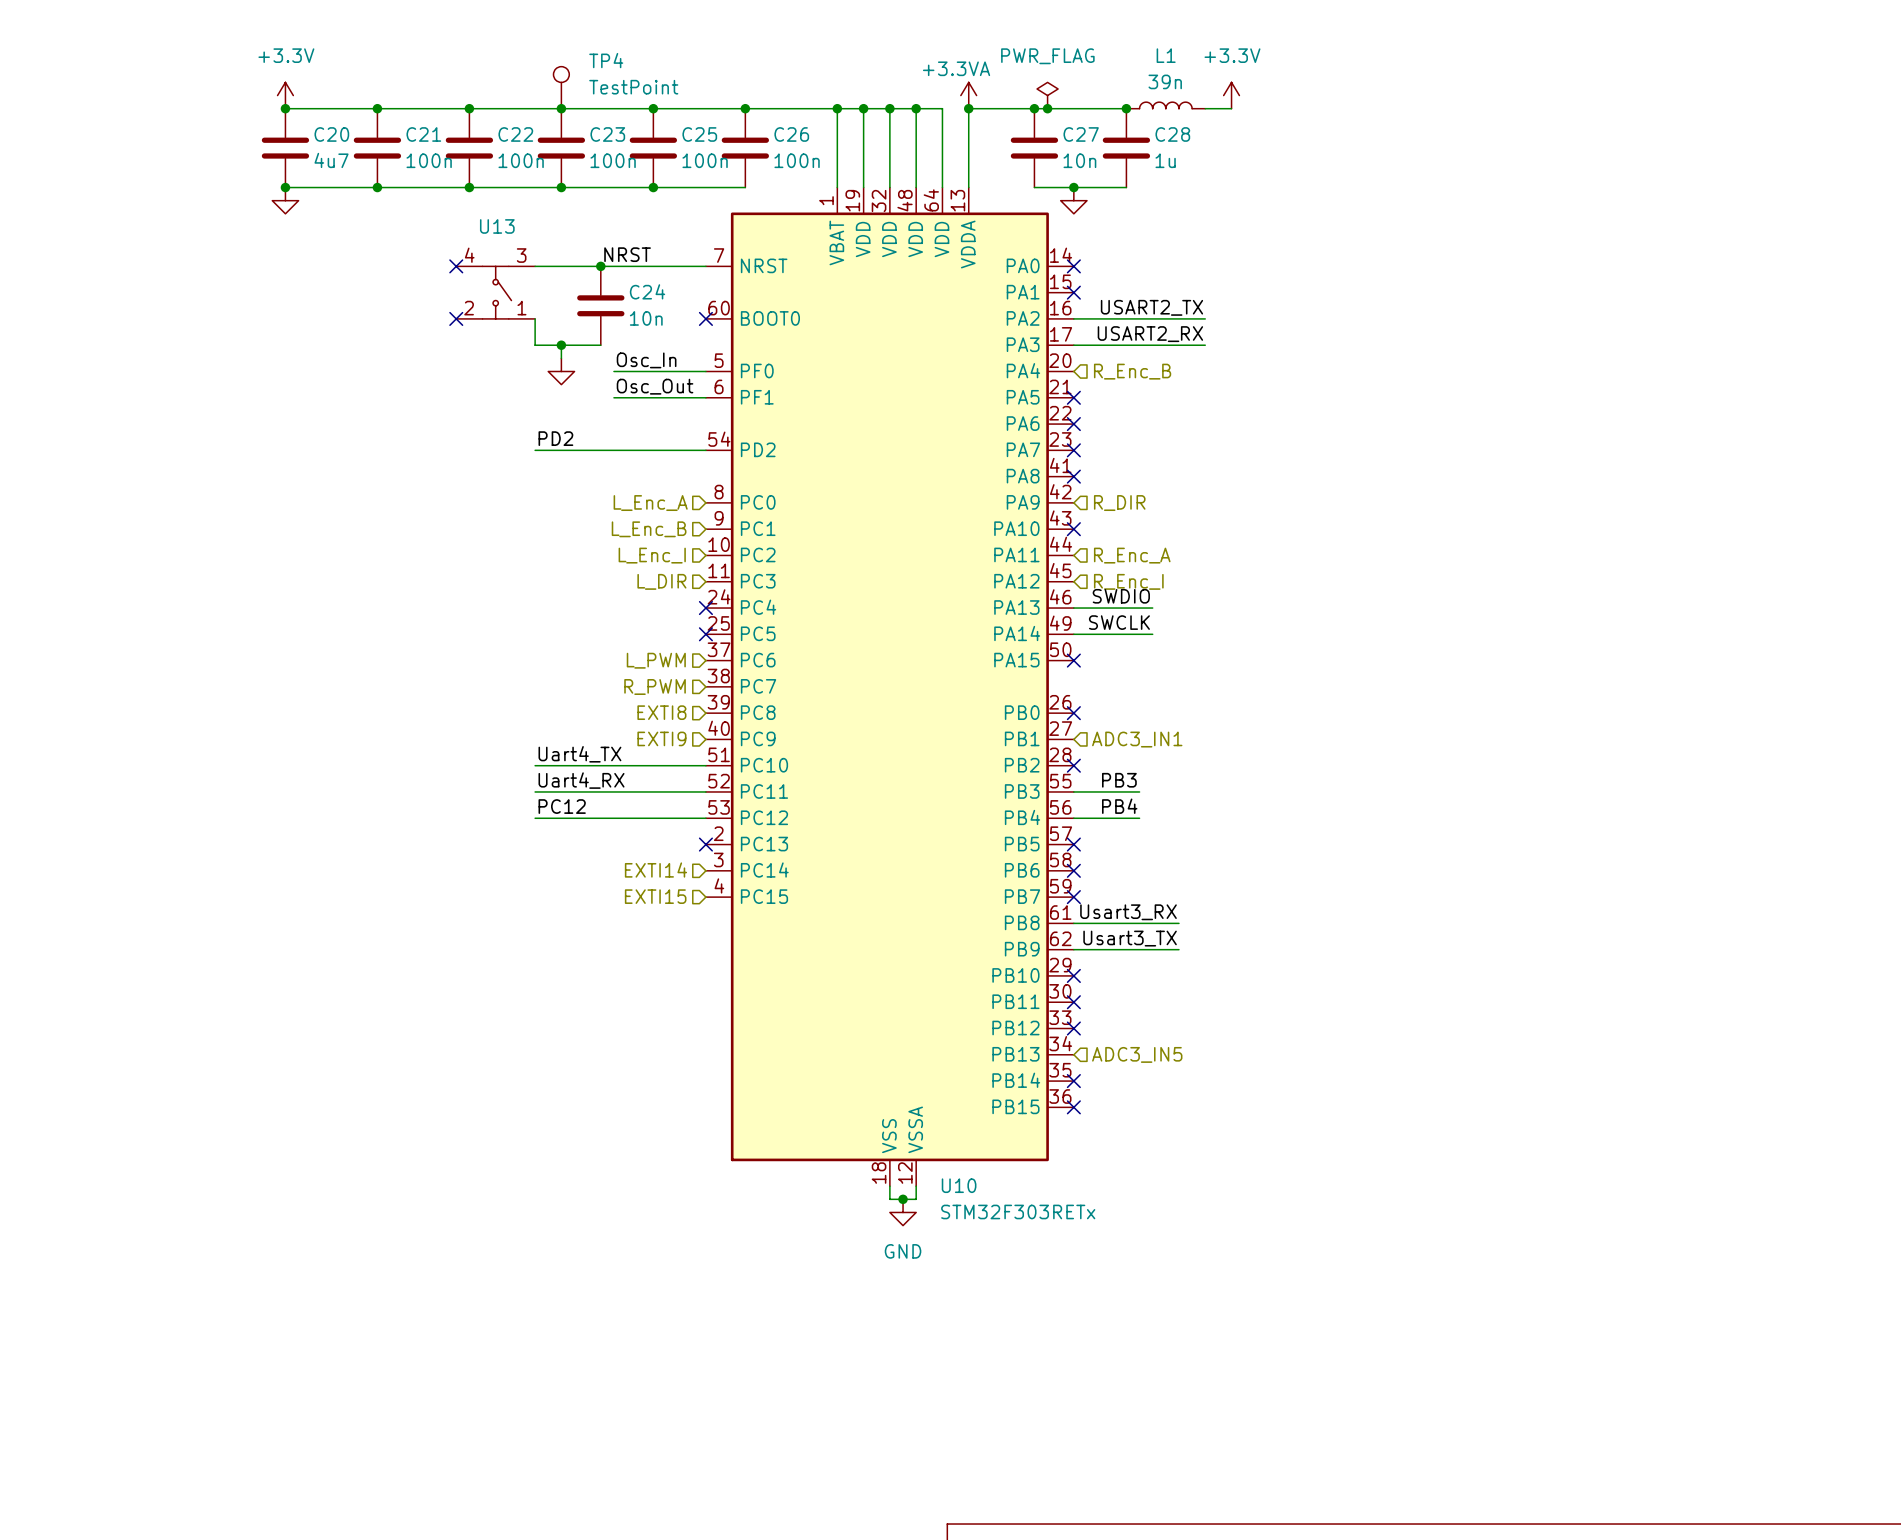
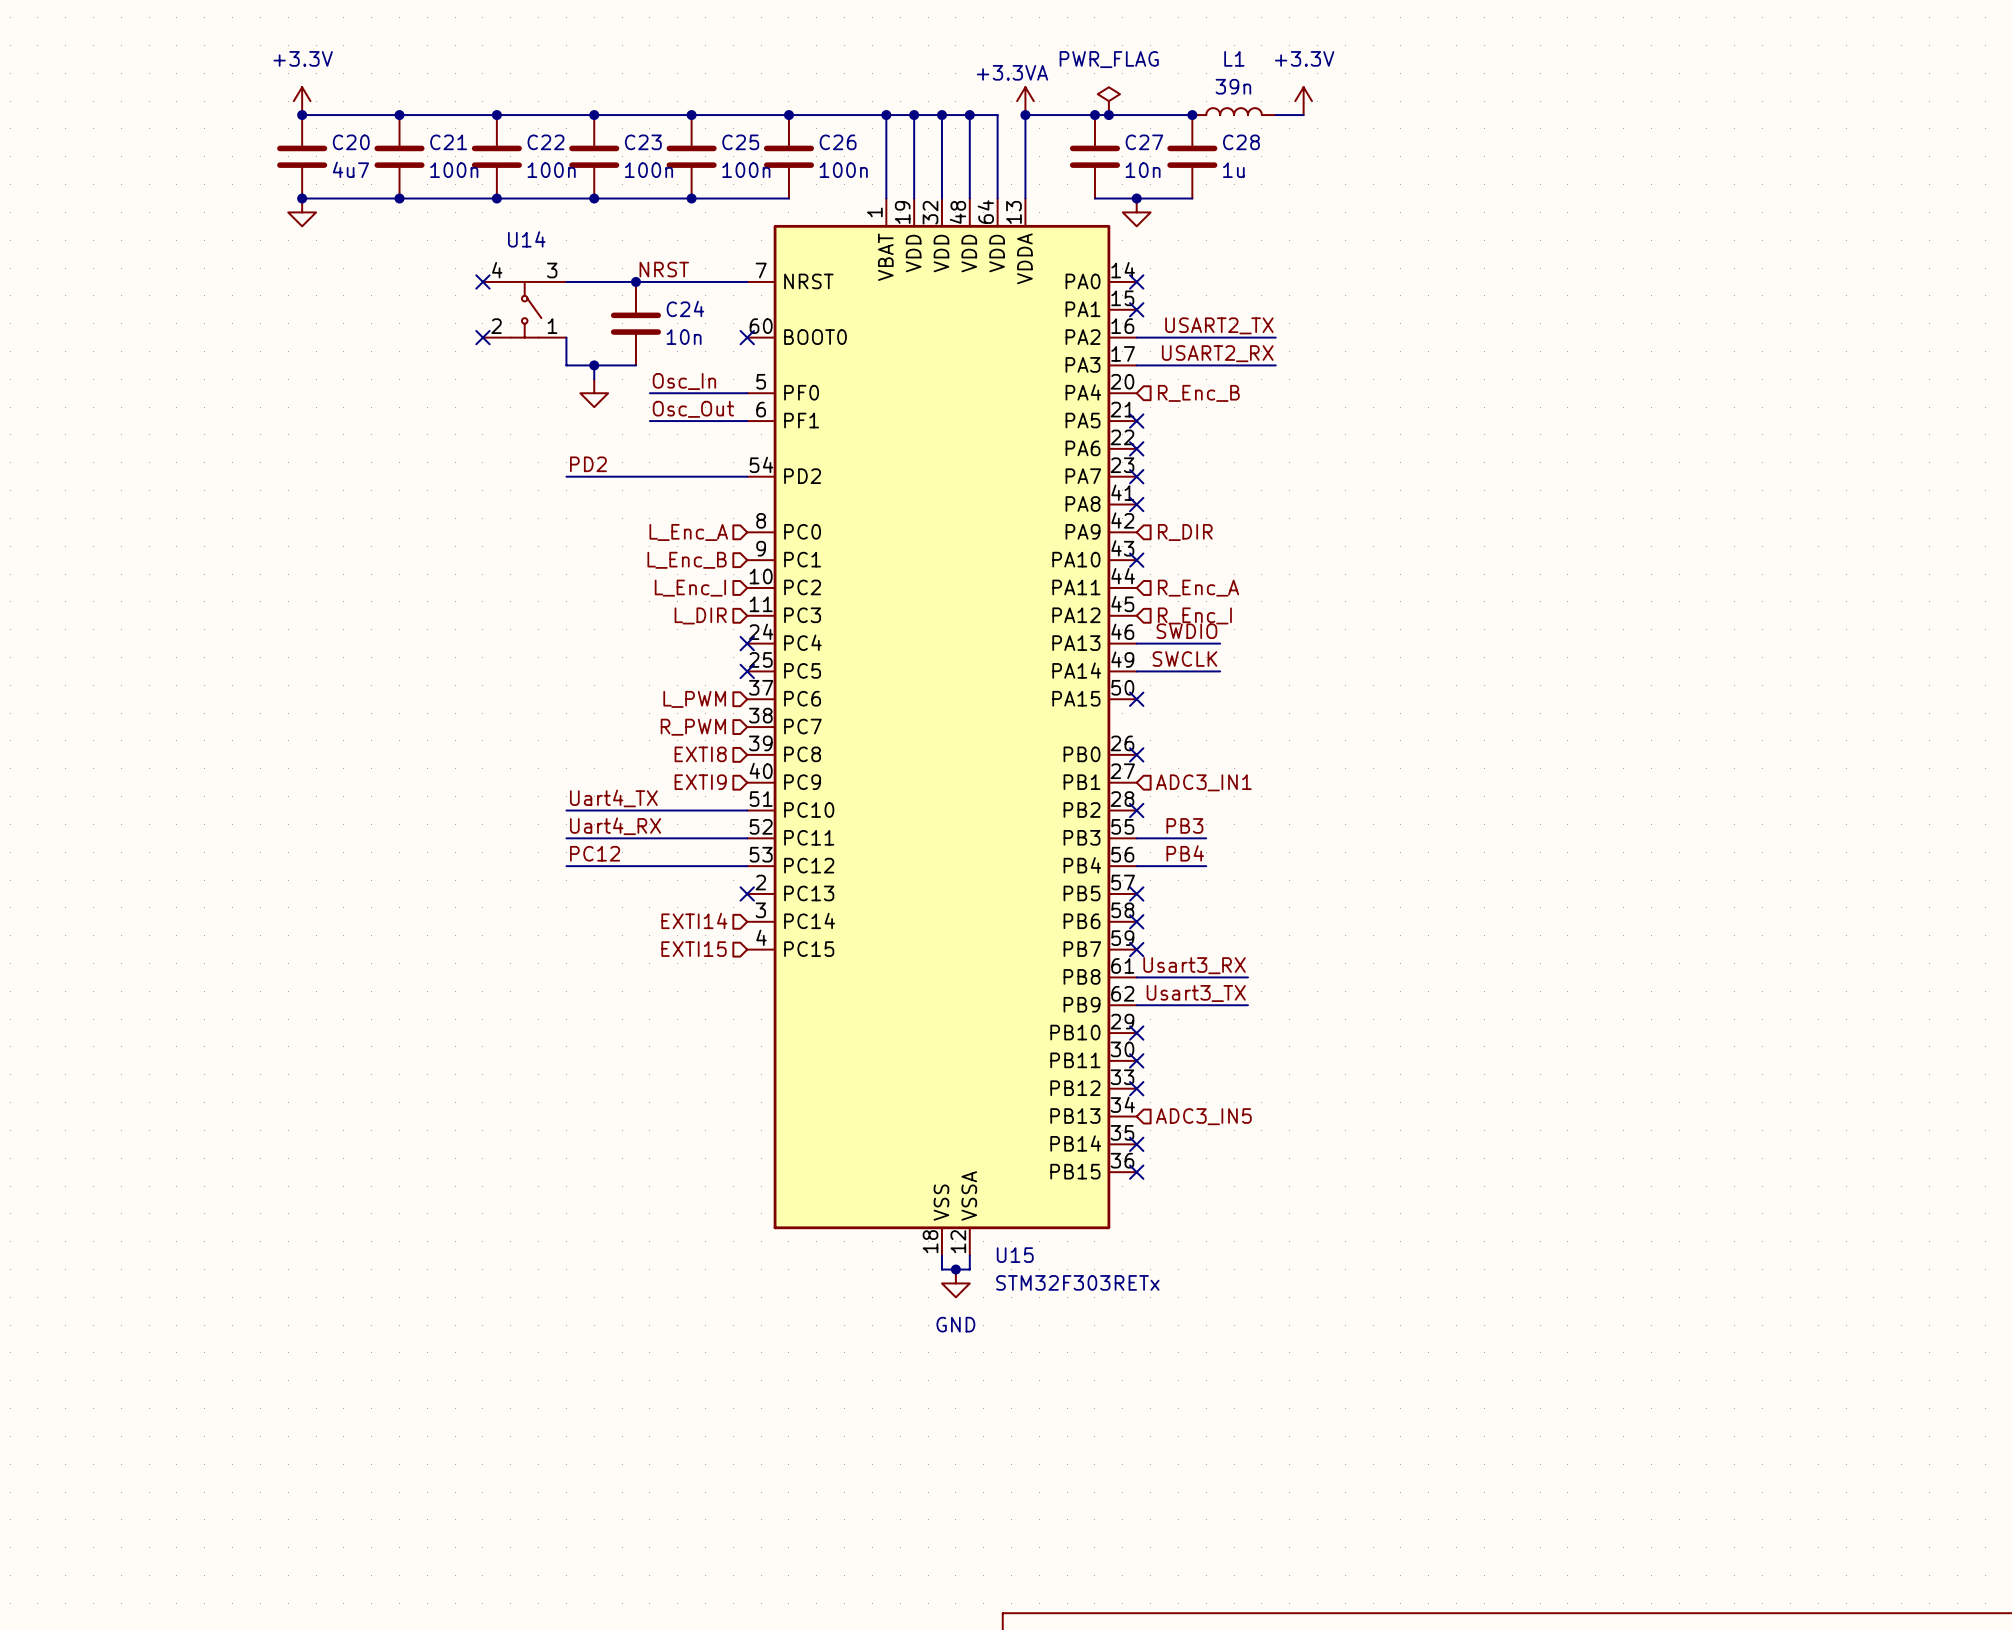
TP4: TestPoint (561, 87) -> none
U13 name: U13 (497, 226) -> U14 (526, 239)
U10 name: U10 (959, 1185) -> U15 (1015, 1255)

